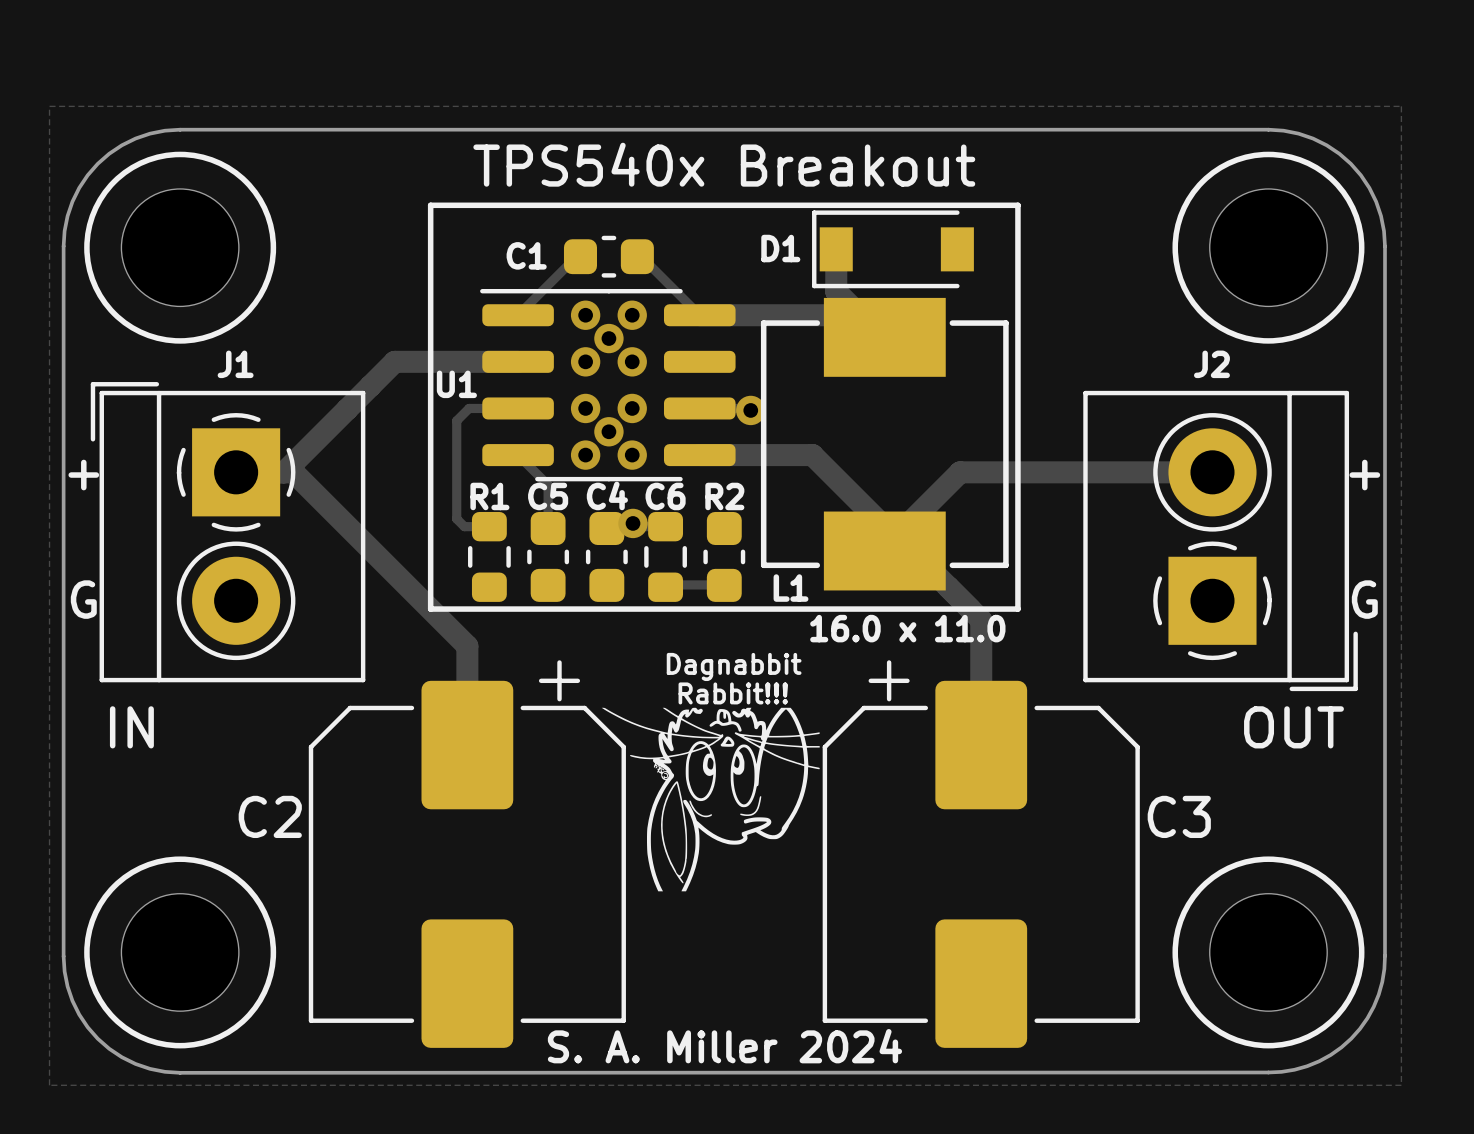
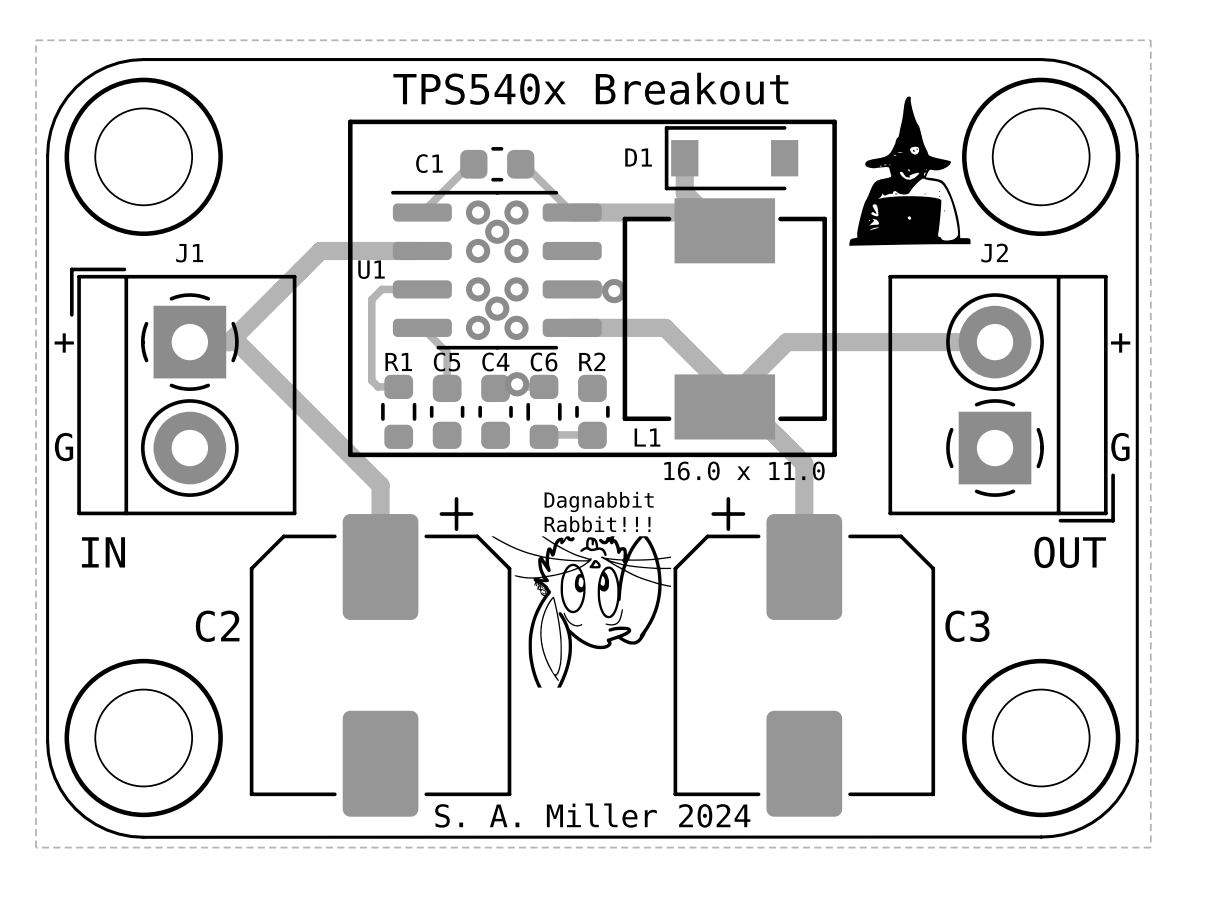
drawing: none -> [849, 96, 971, 246]

